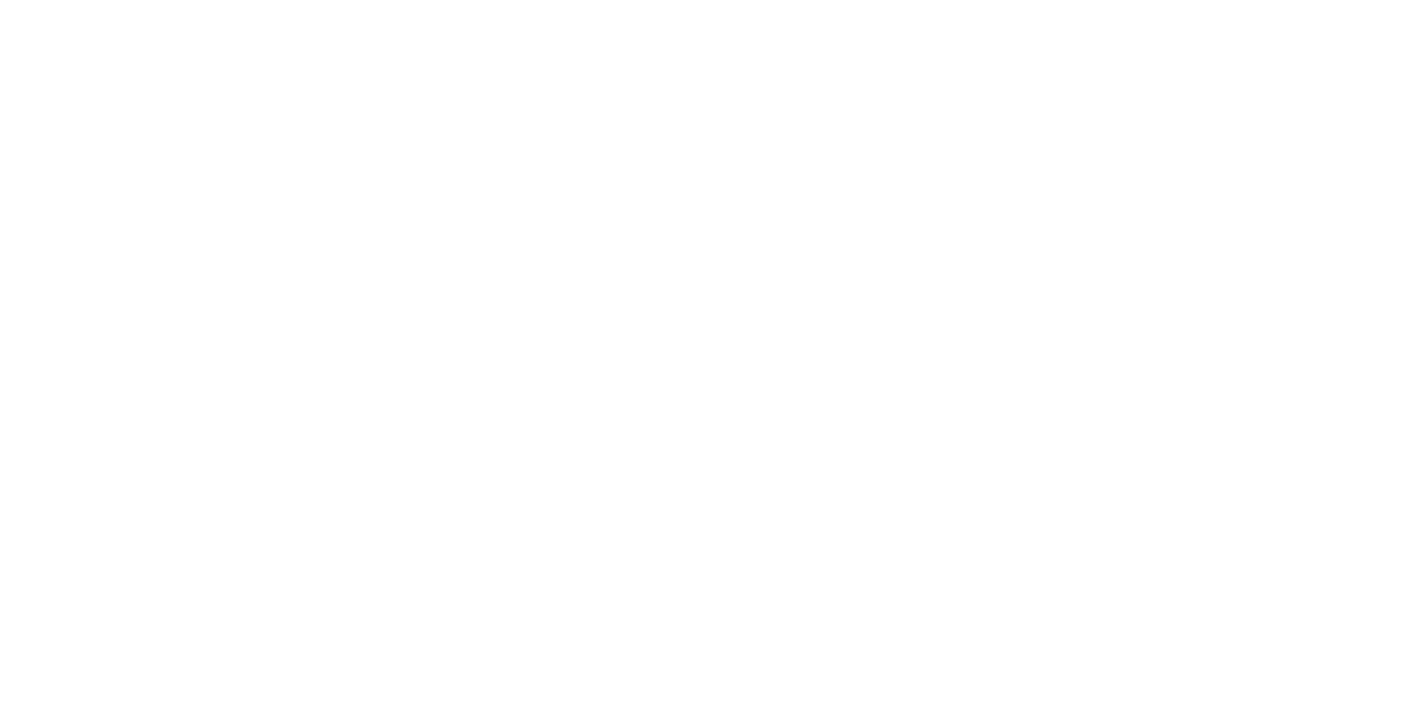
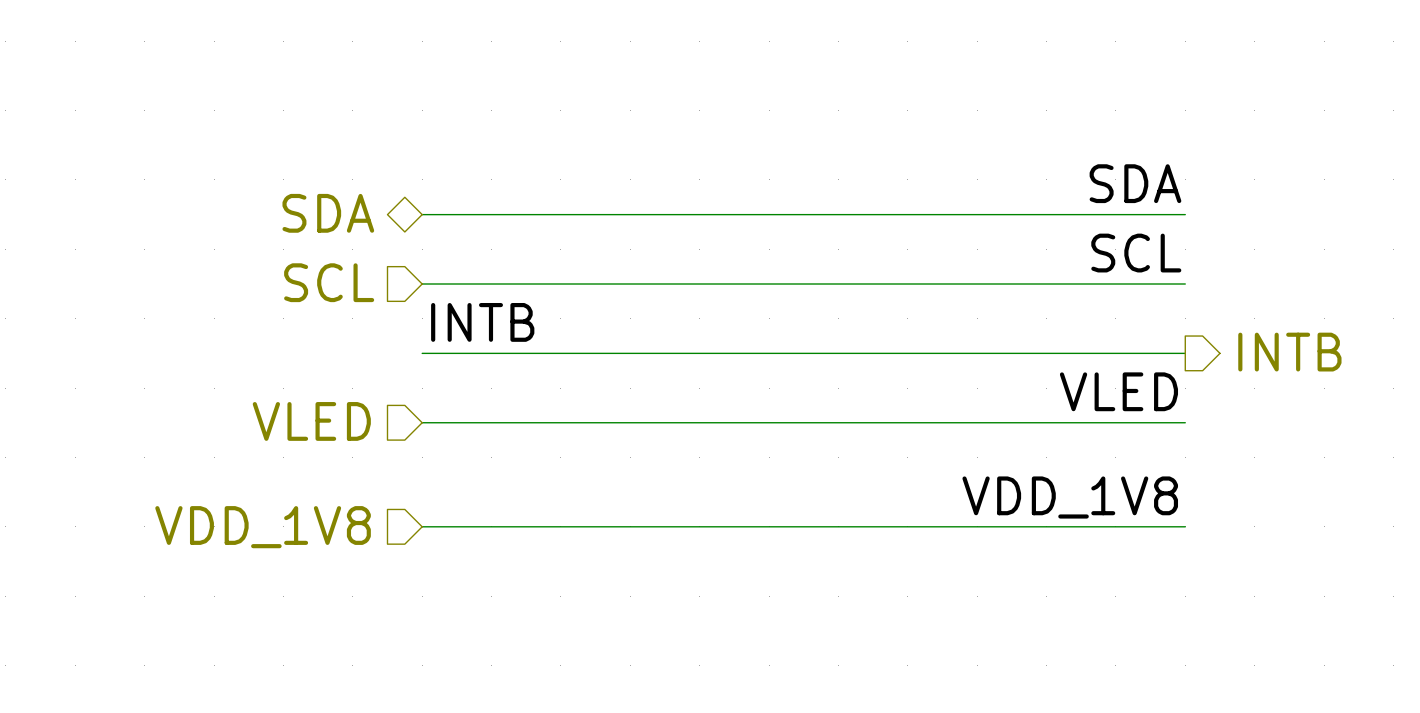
label: none -> SDA (1135, 183)
hierarchical label: none -> SDA (328, 213)
wire: none -> (422, 214) (1185, 214)
label: none -> SCL (1136, 253)
hierarchical label: none -> SCL (329, 282)
wire: none -> (422, 284) (1185, 284)
label: none -> INTB (482, 322)
hierarchical label: none -> INTB (1289, 352)
wire: none -> (422, 353) (1185, 353)
label: none -> VLED (1118, 391)
hierarchical label: none -> VLED (311, 421)
wire: none -> (422, 422) (1185, 422)
label: none -> VDD_1V8 (1070, 497)
wire: none -> (422, 526) (1185, 526)
hierarchical label: none -> VDD_1V8 (263, 527)

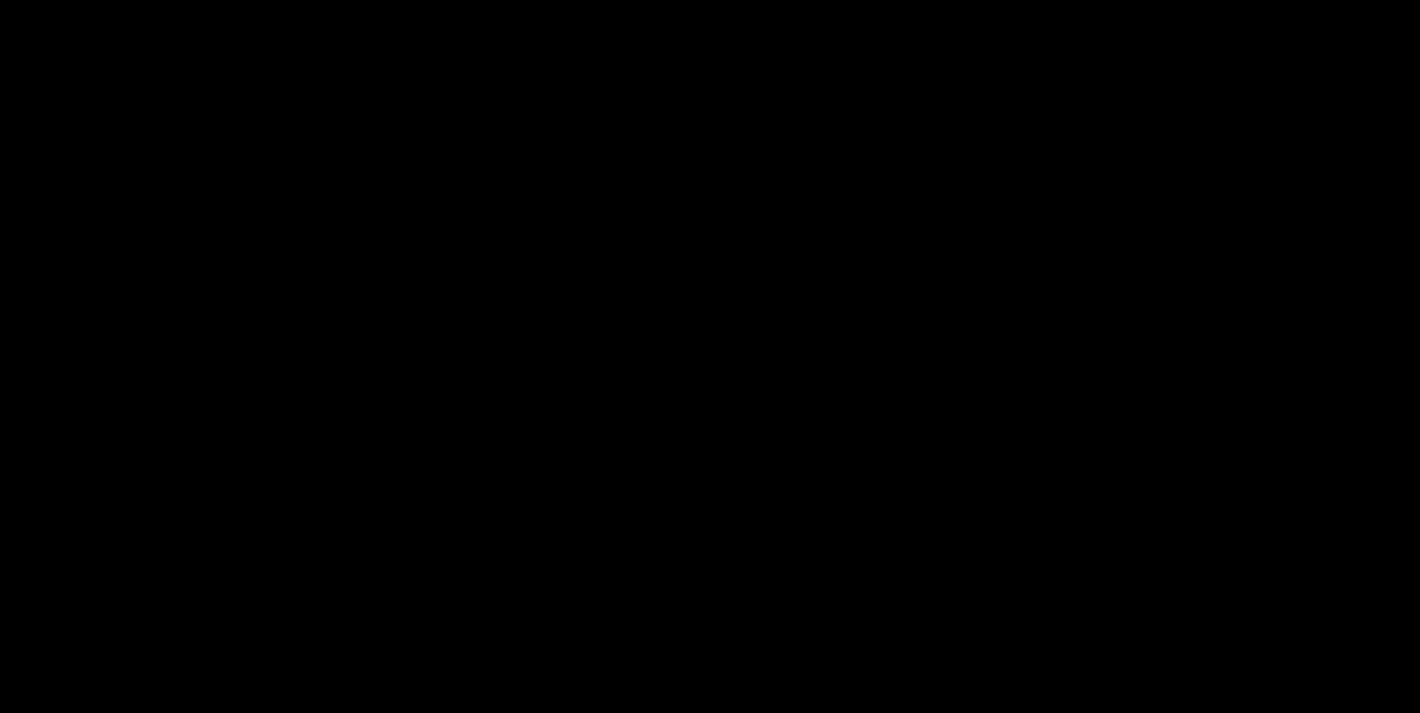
label: SDA (1135, 183) -> none
hierarchical label: SDA (328, 213) -> none
wire: (422, 214) (1185, 214) -> none
label: SCL (1136, 253) -> none
hierarchical label: SCL (329, 282) -> none
wire: (422, 284) (1185, 284) -> none
label: INTB (482, 322) -> none
hierarchical label: INTB (1289, 352) -> none
wire: (422, 353) (1185, 353) -> none
label: VLED (1118, 391) -> none
hierarchical label: VLED (311, 421) -> none
wire: (422, 422) (1185, 422) -> none
label: VDD_1V8 (1070, 497) -> none
wire: (422, 526) (1185, 526) -> none
hierarchical label: VDD_1V8 (263, 527) -> none

